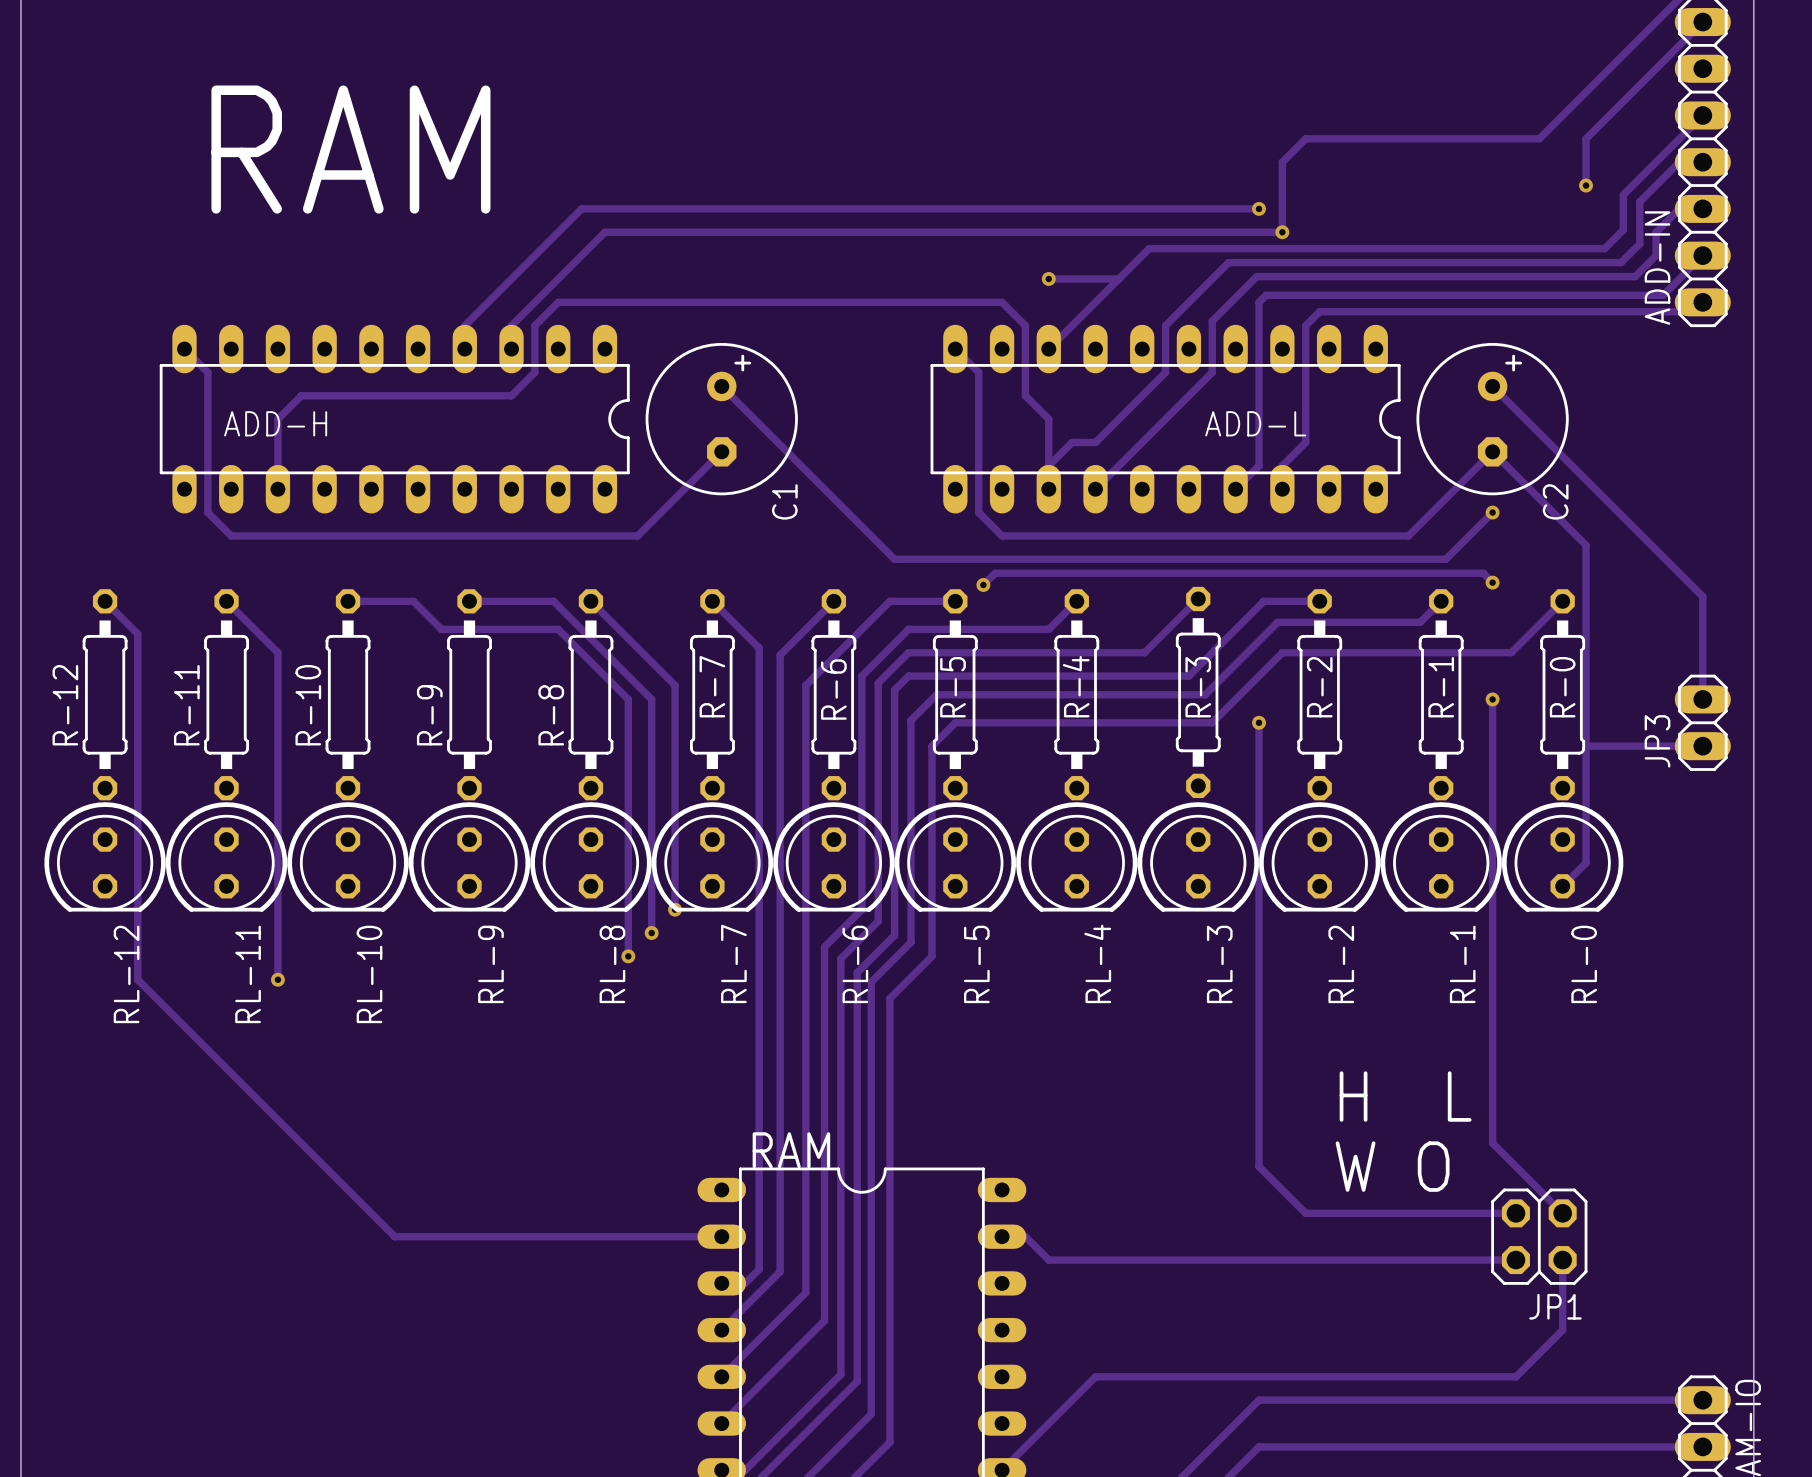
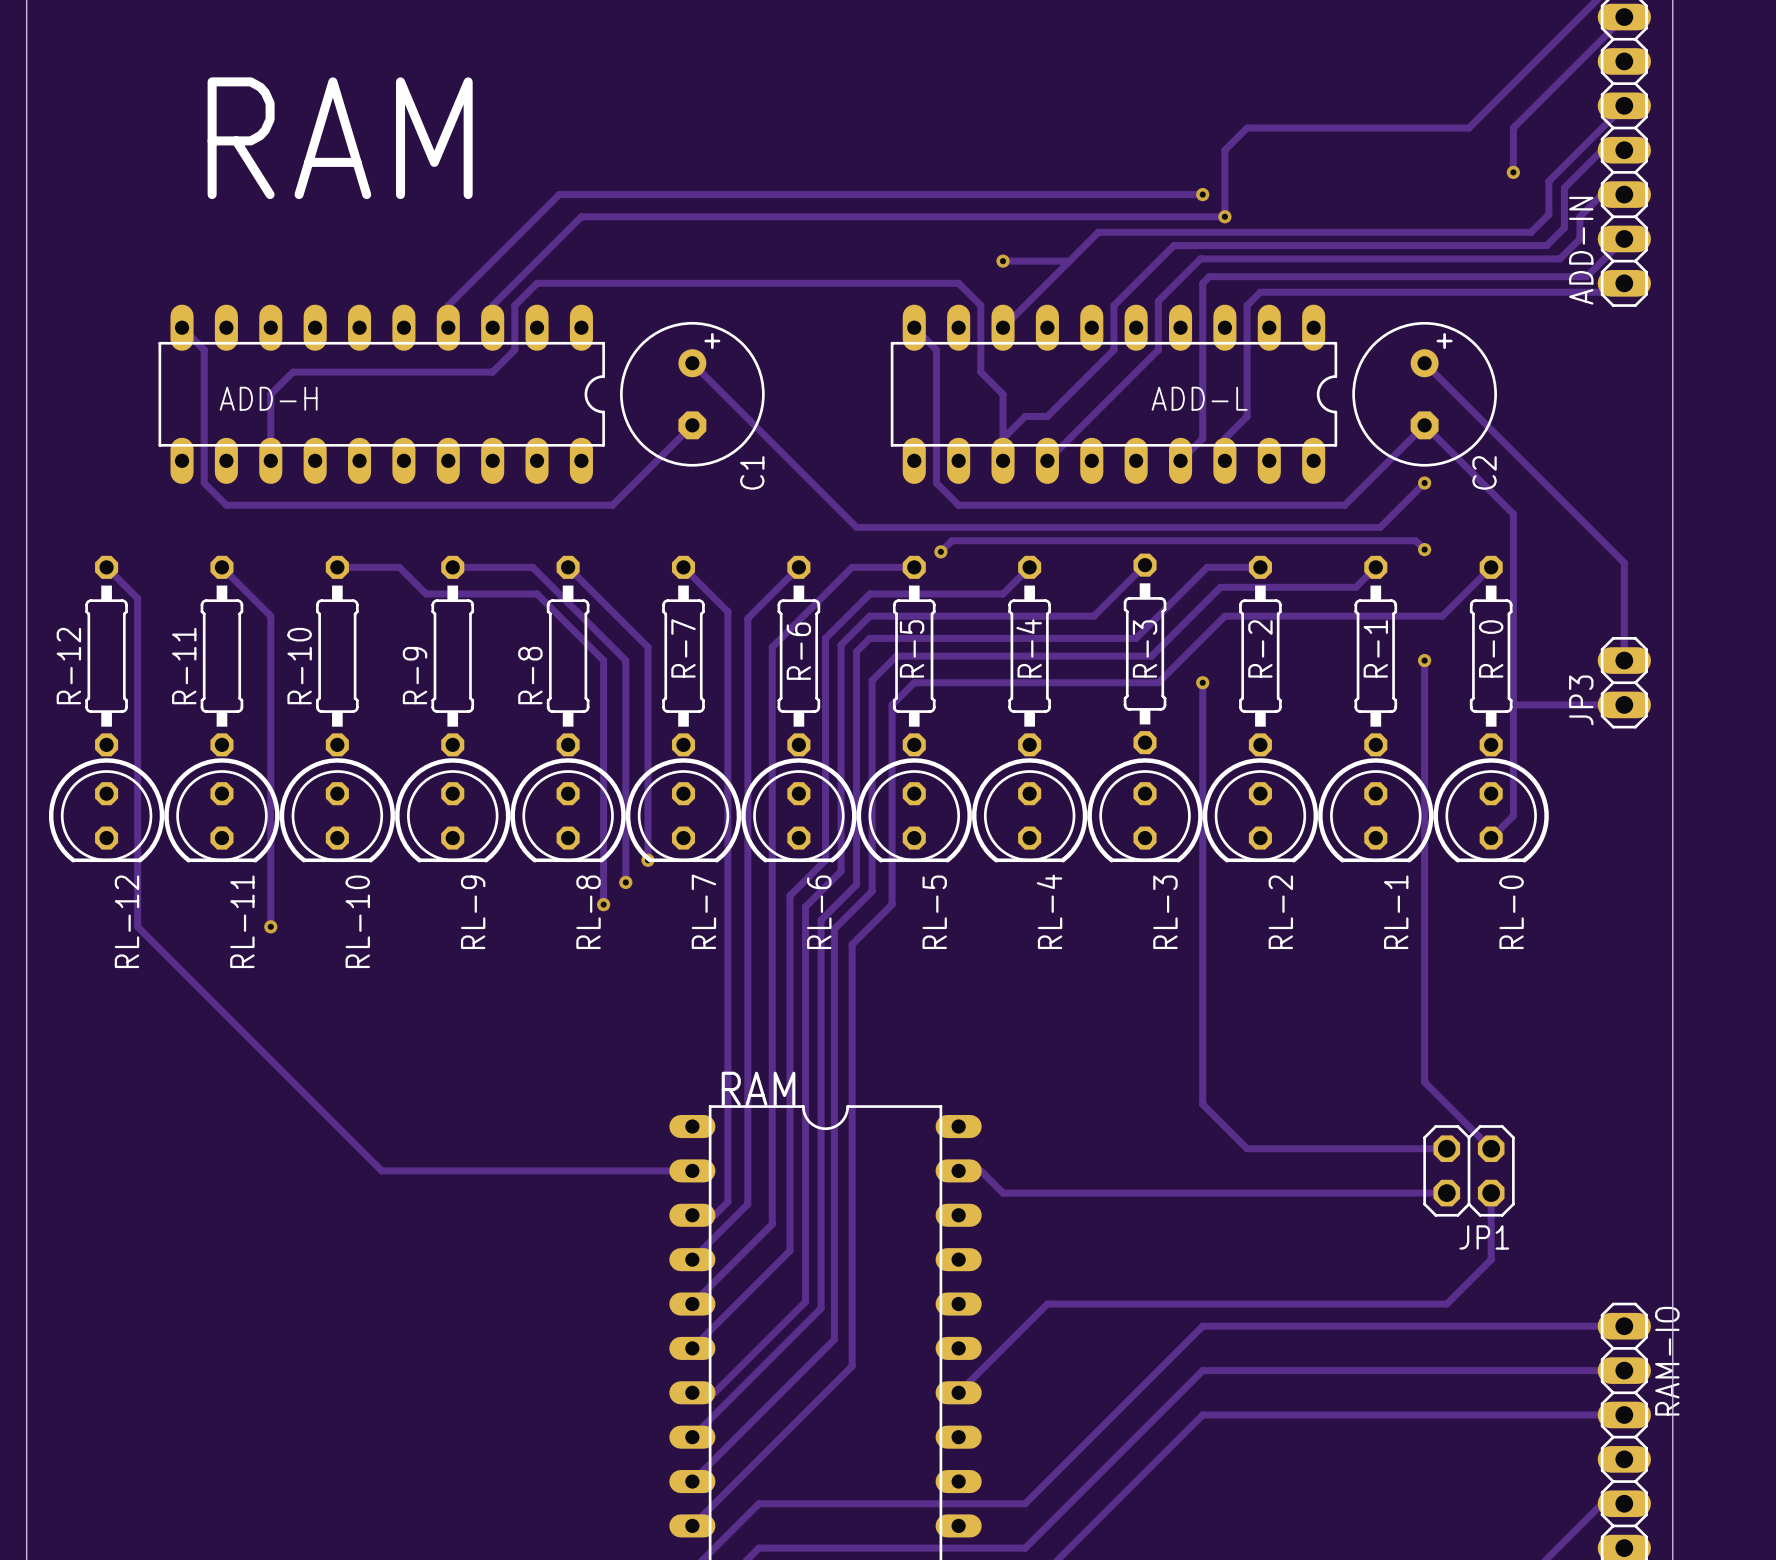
text: H L (1405, 1096) -> none
text: W O (1392, 1166) -> none

